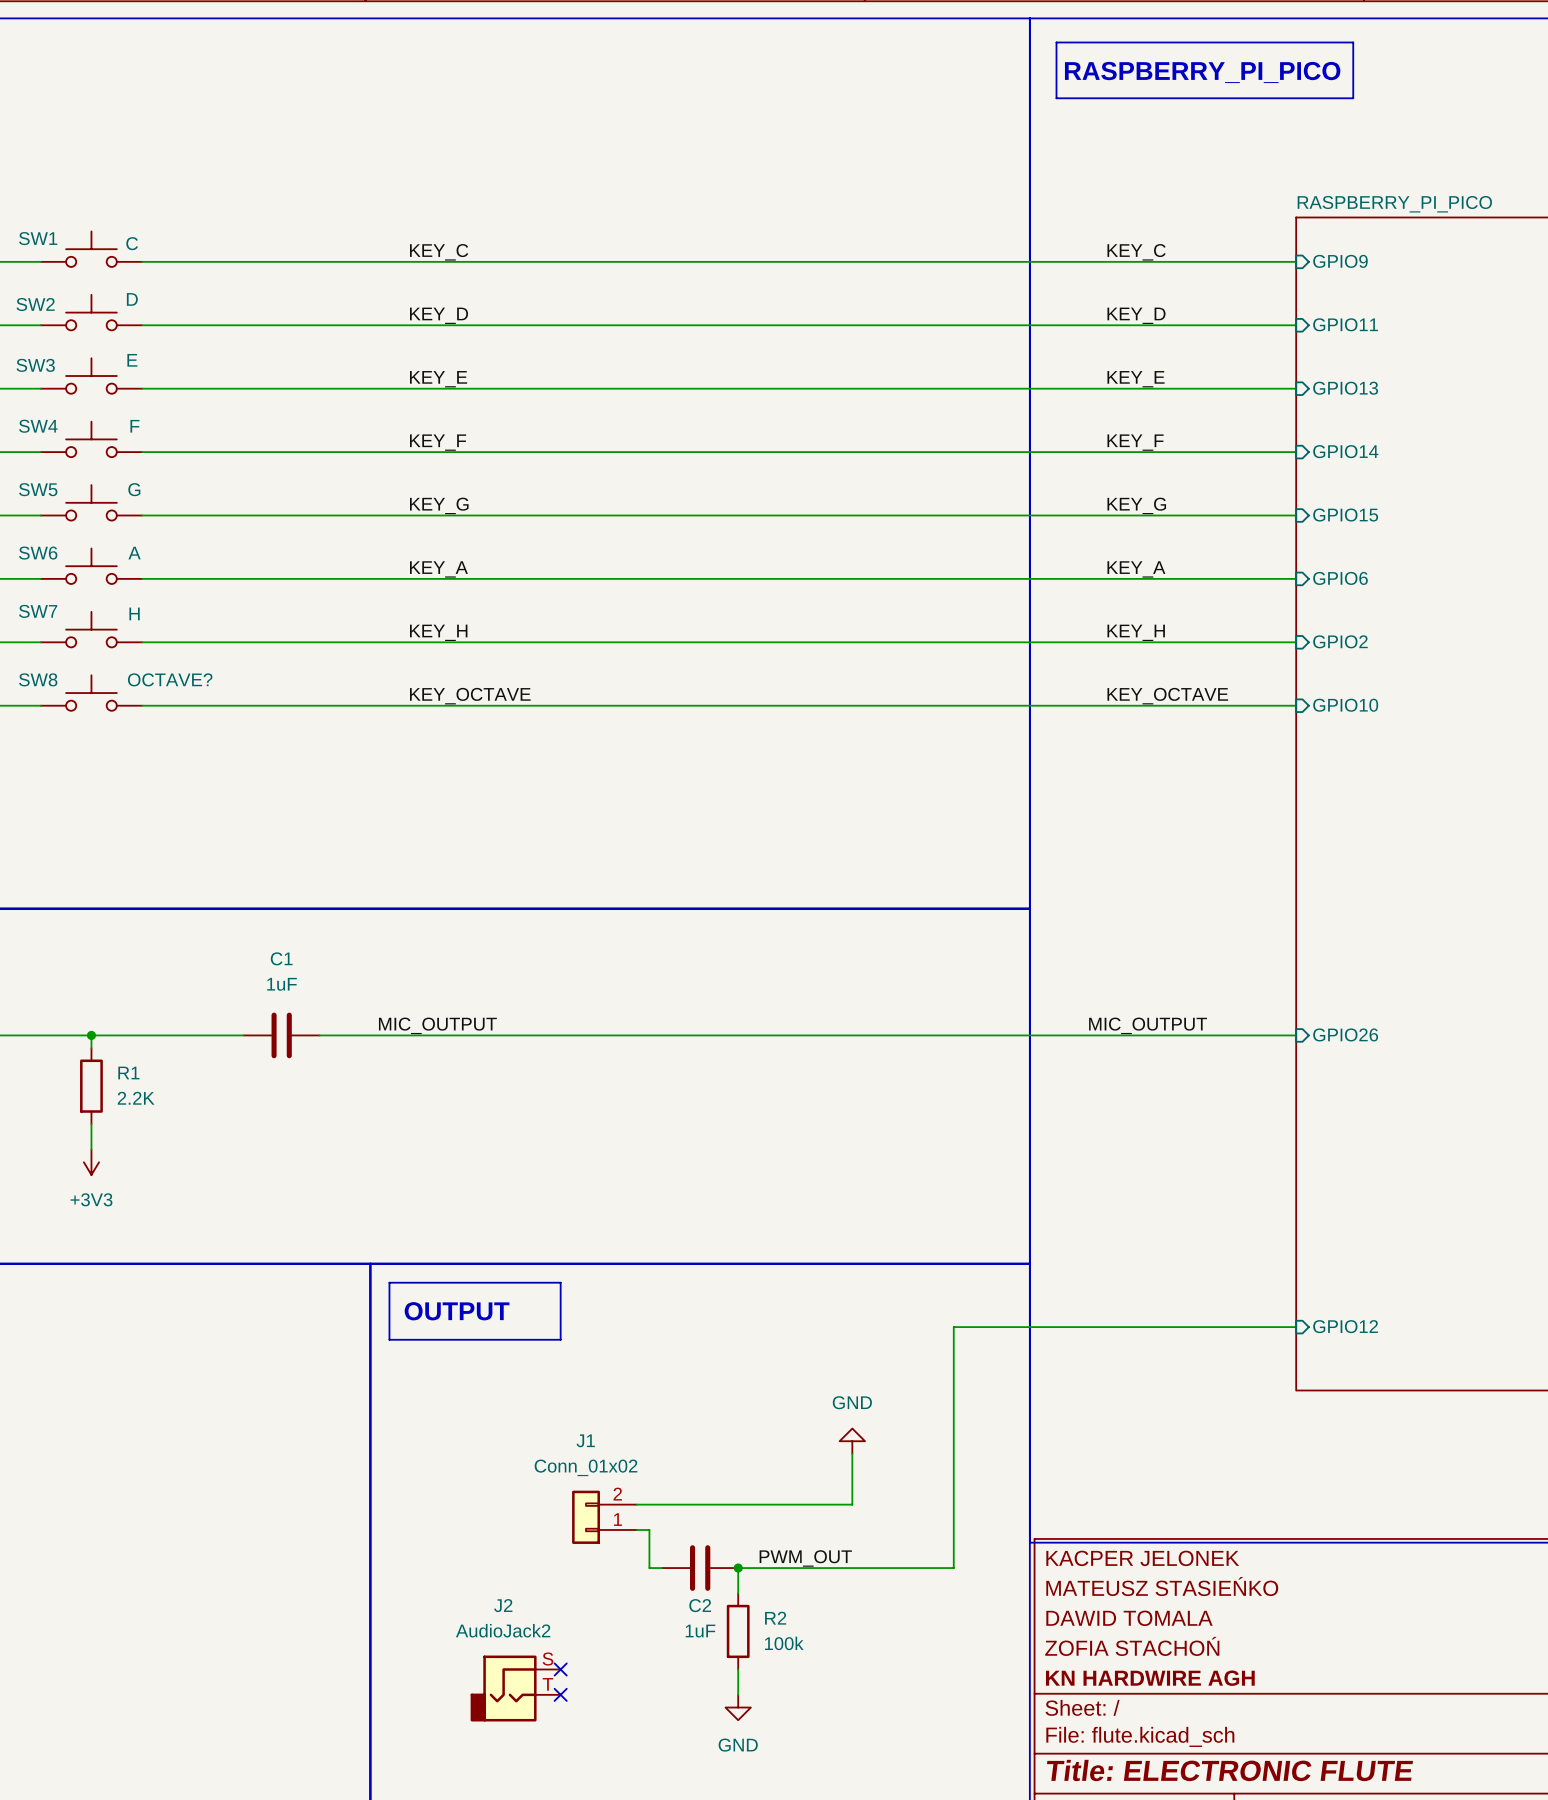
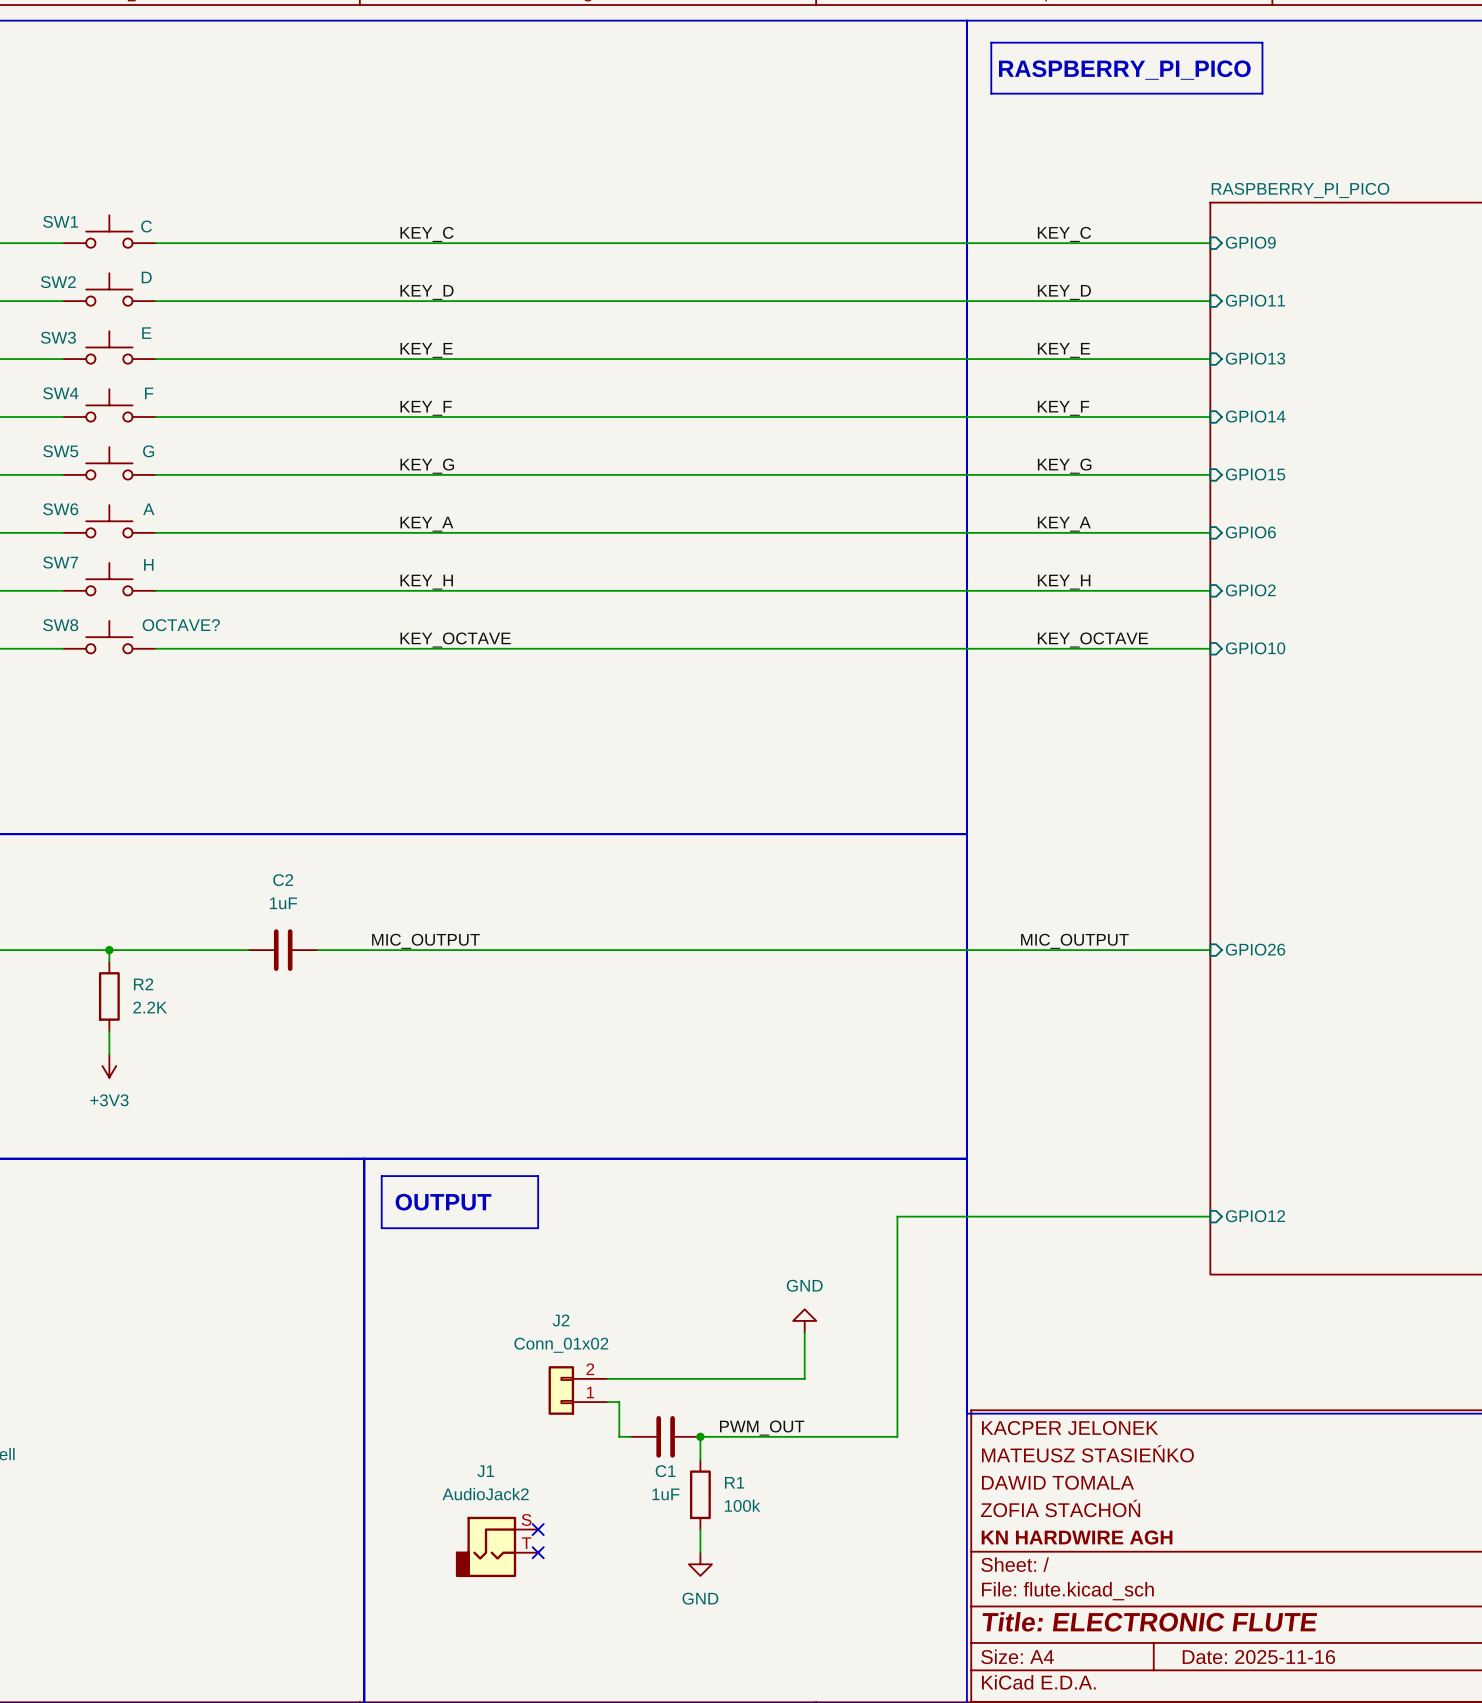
C1 name: C1 (281, 958) -> C2 (283, 880)
R1 name: R1 (128, 1073) -> R2 (143, 984)
J1 name: J1 (585, 1440) -> J2 (561, 1320)
J2 name: J2 (503, 1605) -> J1 (485, 1471)
C2 name: C2 (700, 1605) -> C1 (665, 1471)
R2 name: R2 (775, 1618) -> R1 (734, 1482)

